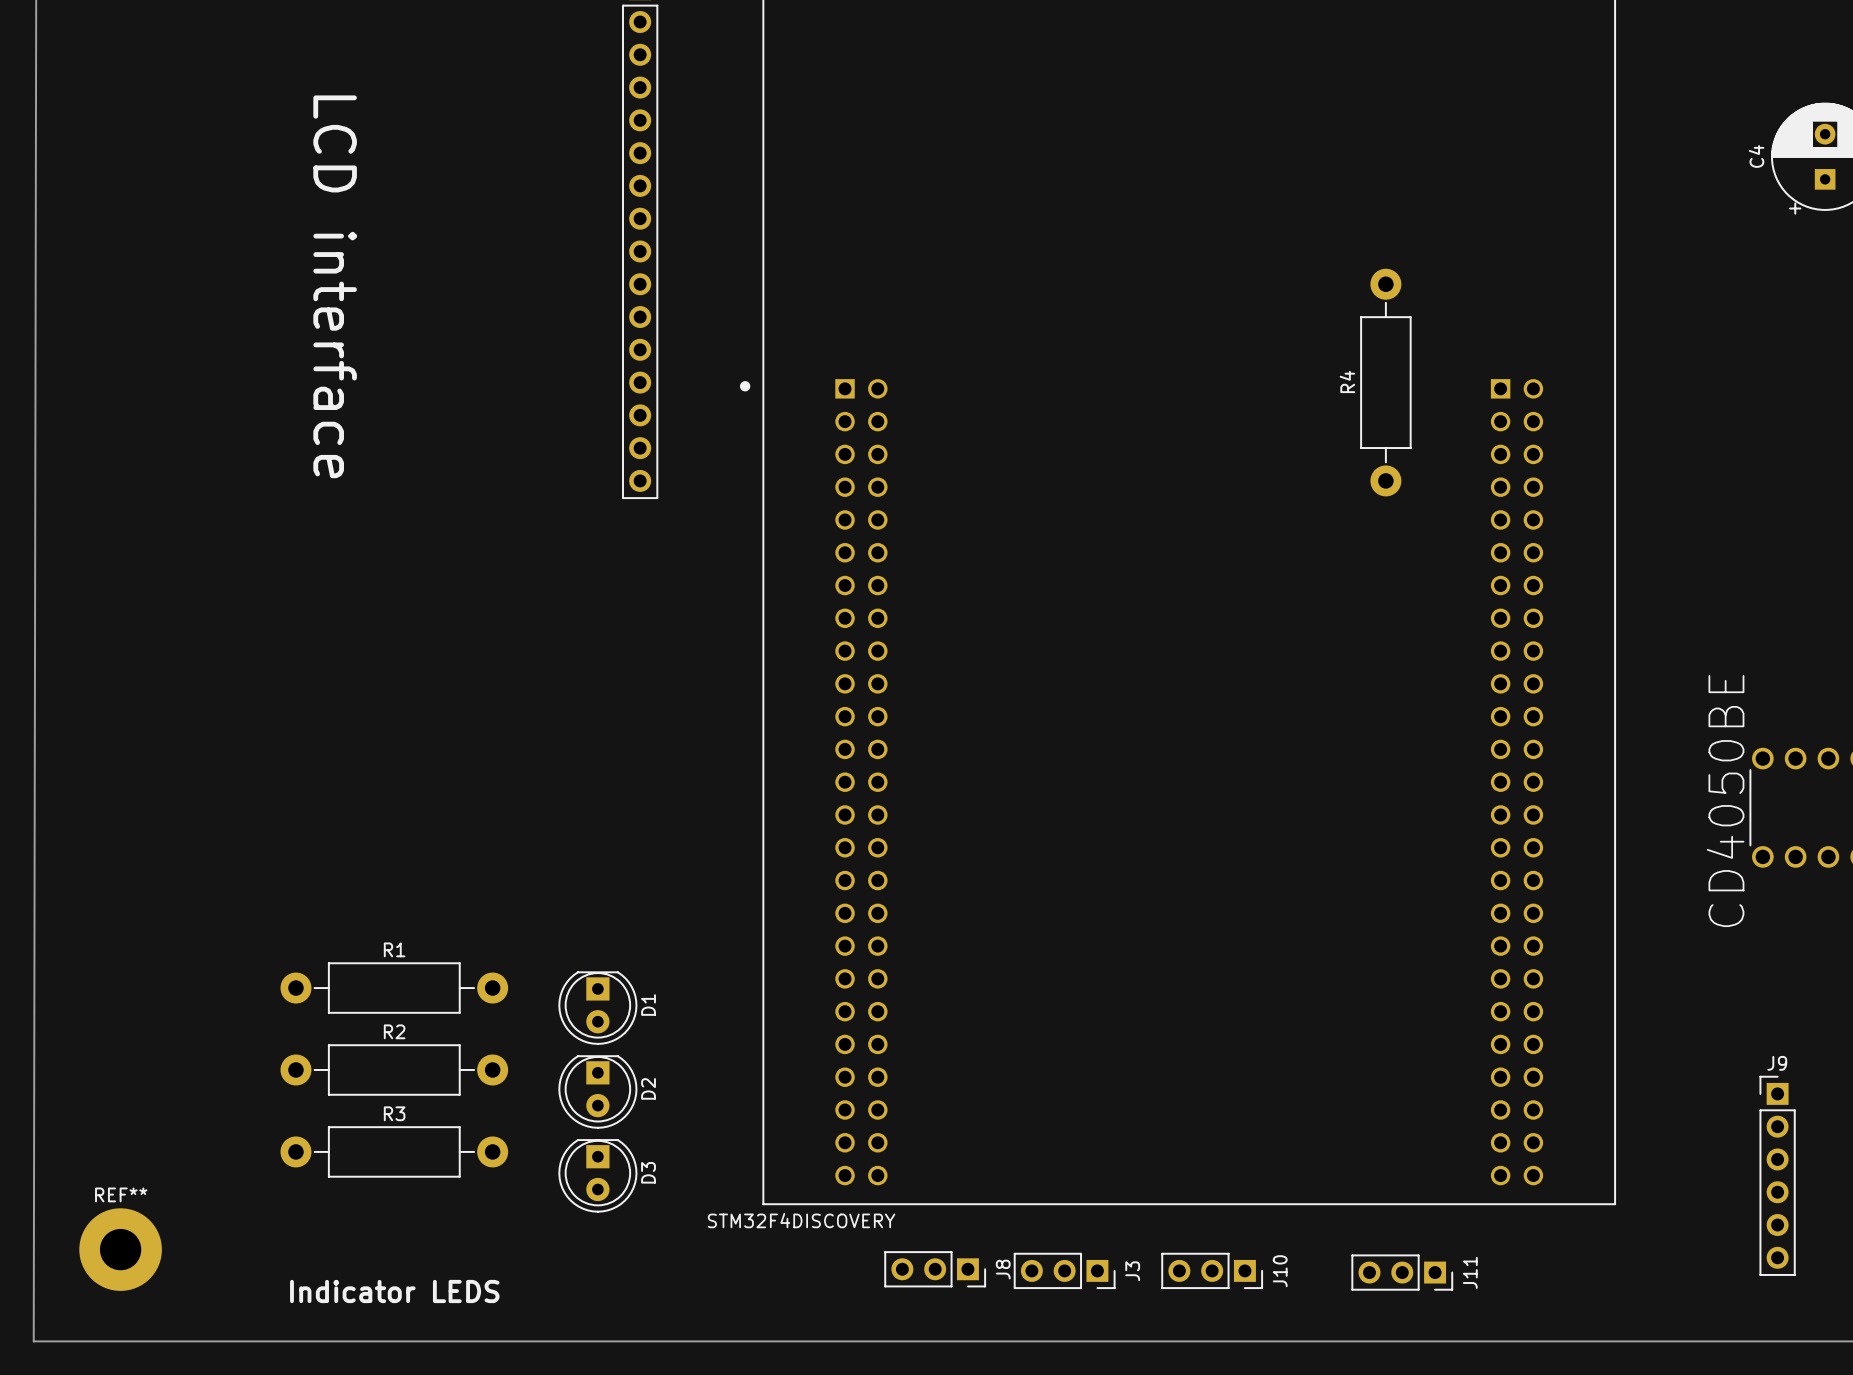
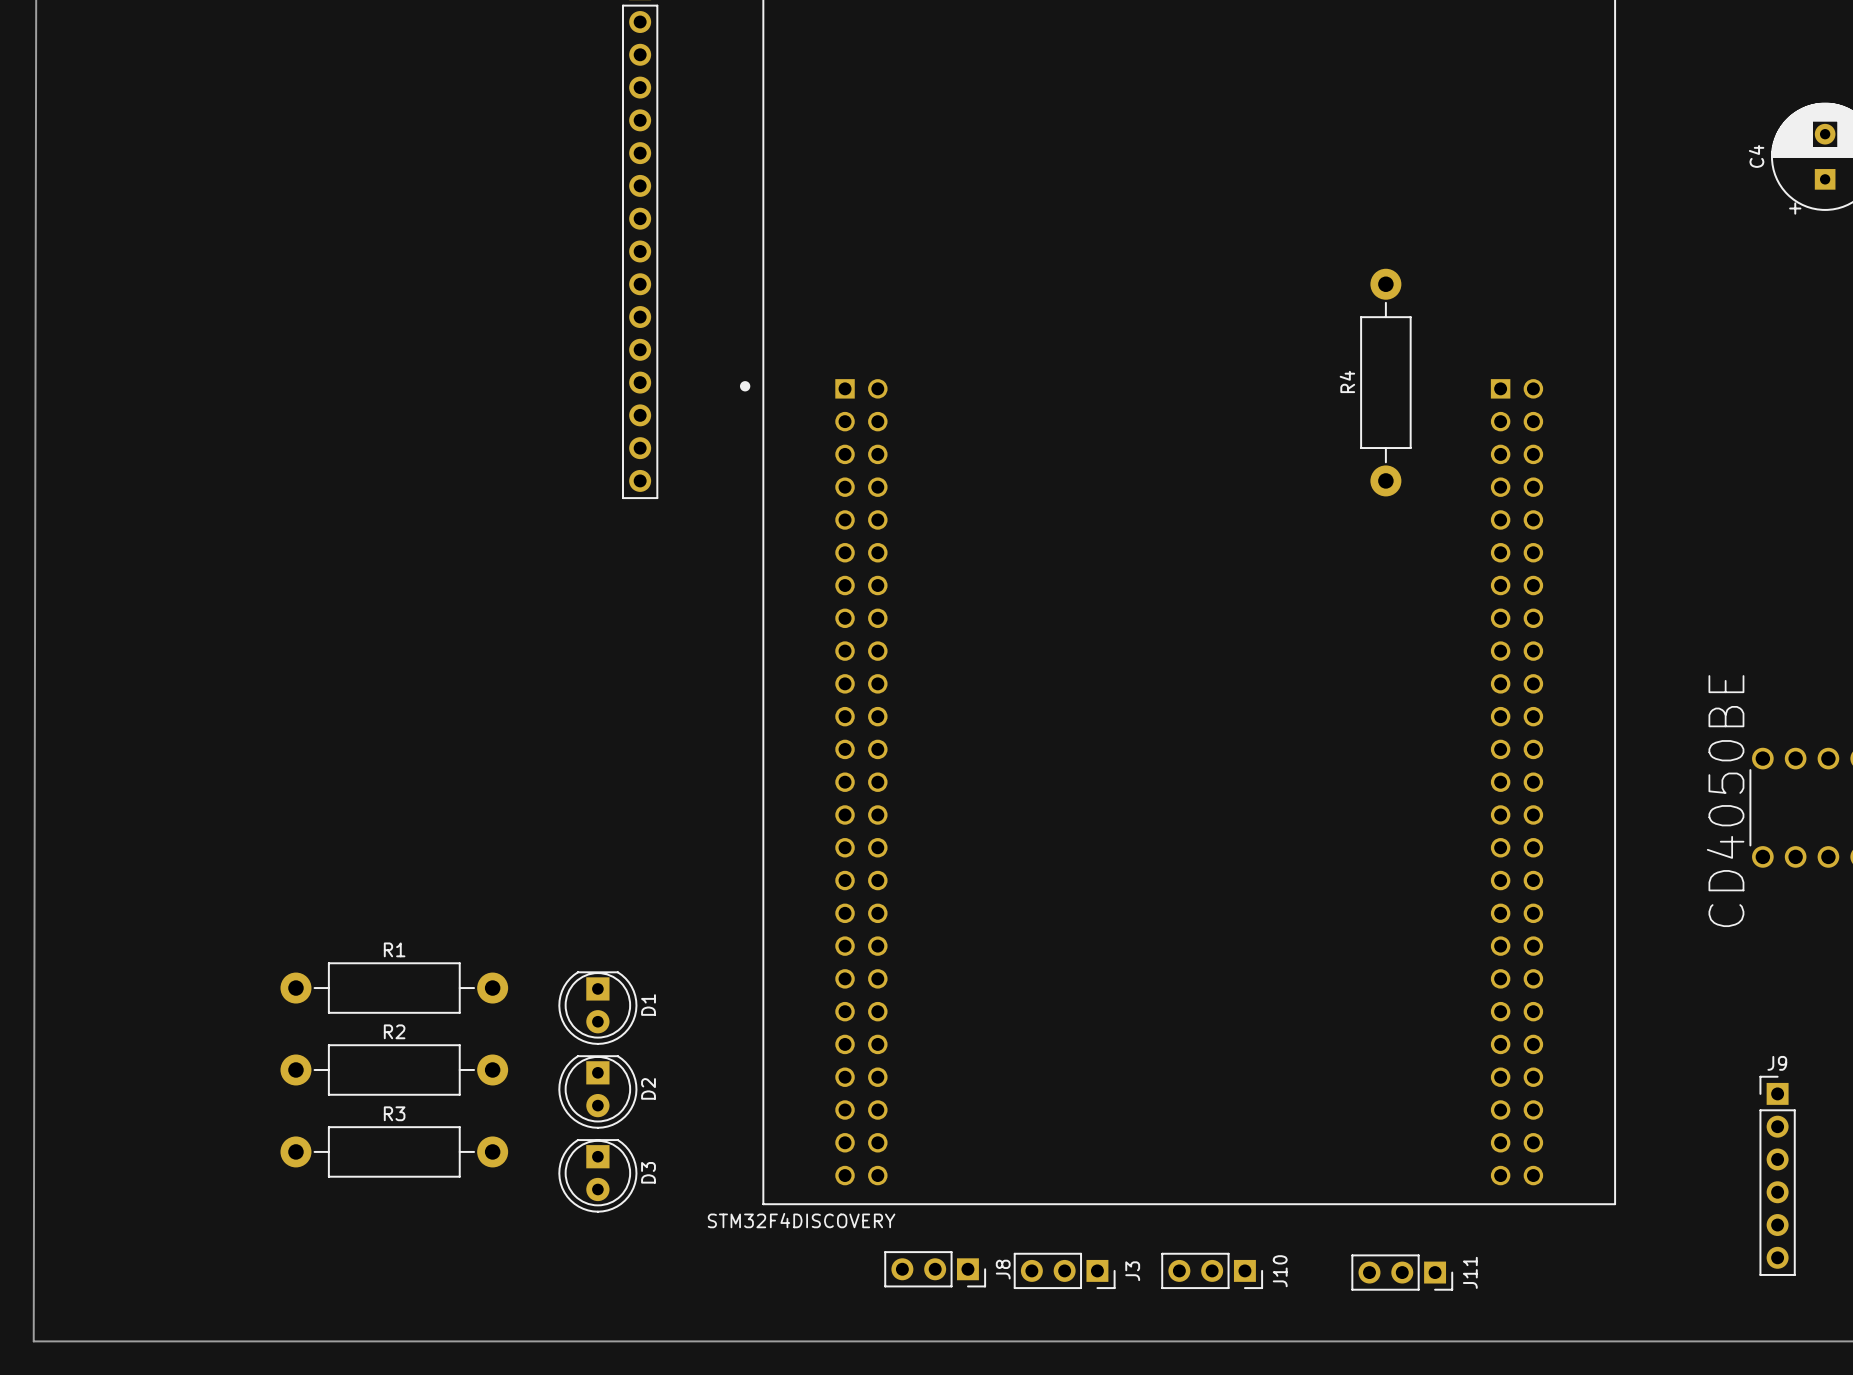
text: LCD interface (335, 286) -> none
REF**: (120, 1249) -> none
text: Indicator LEDS (394, 1291) -> none

